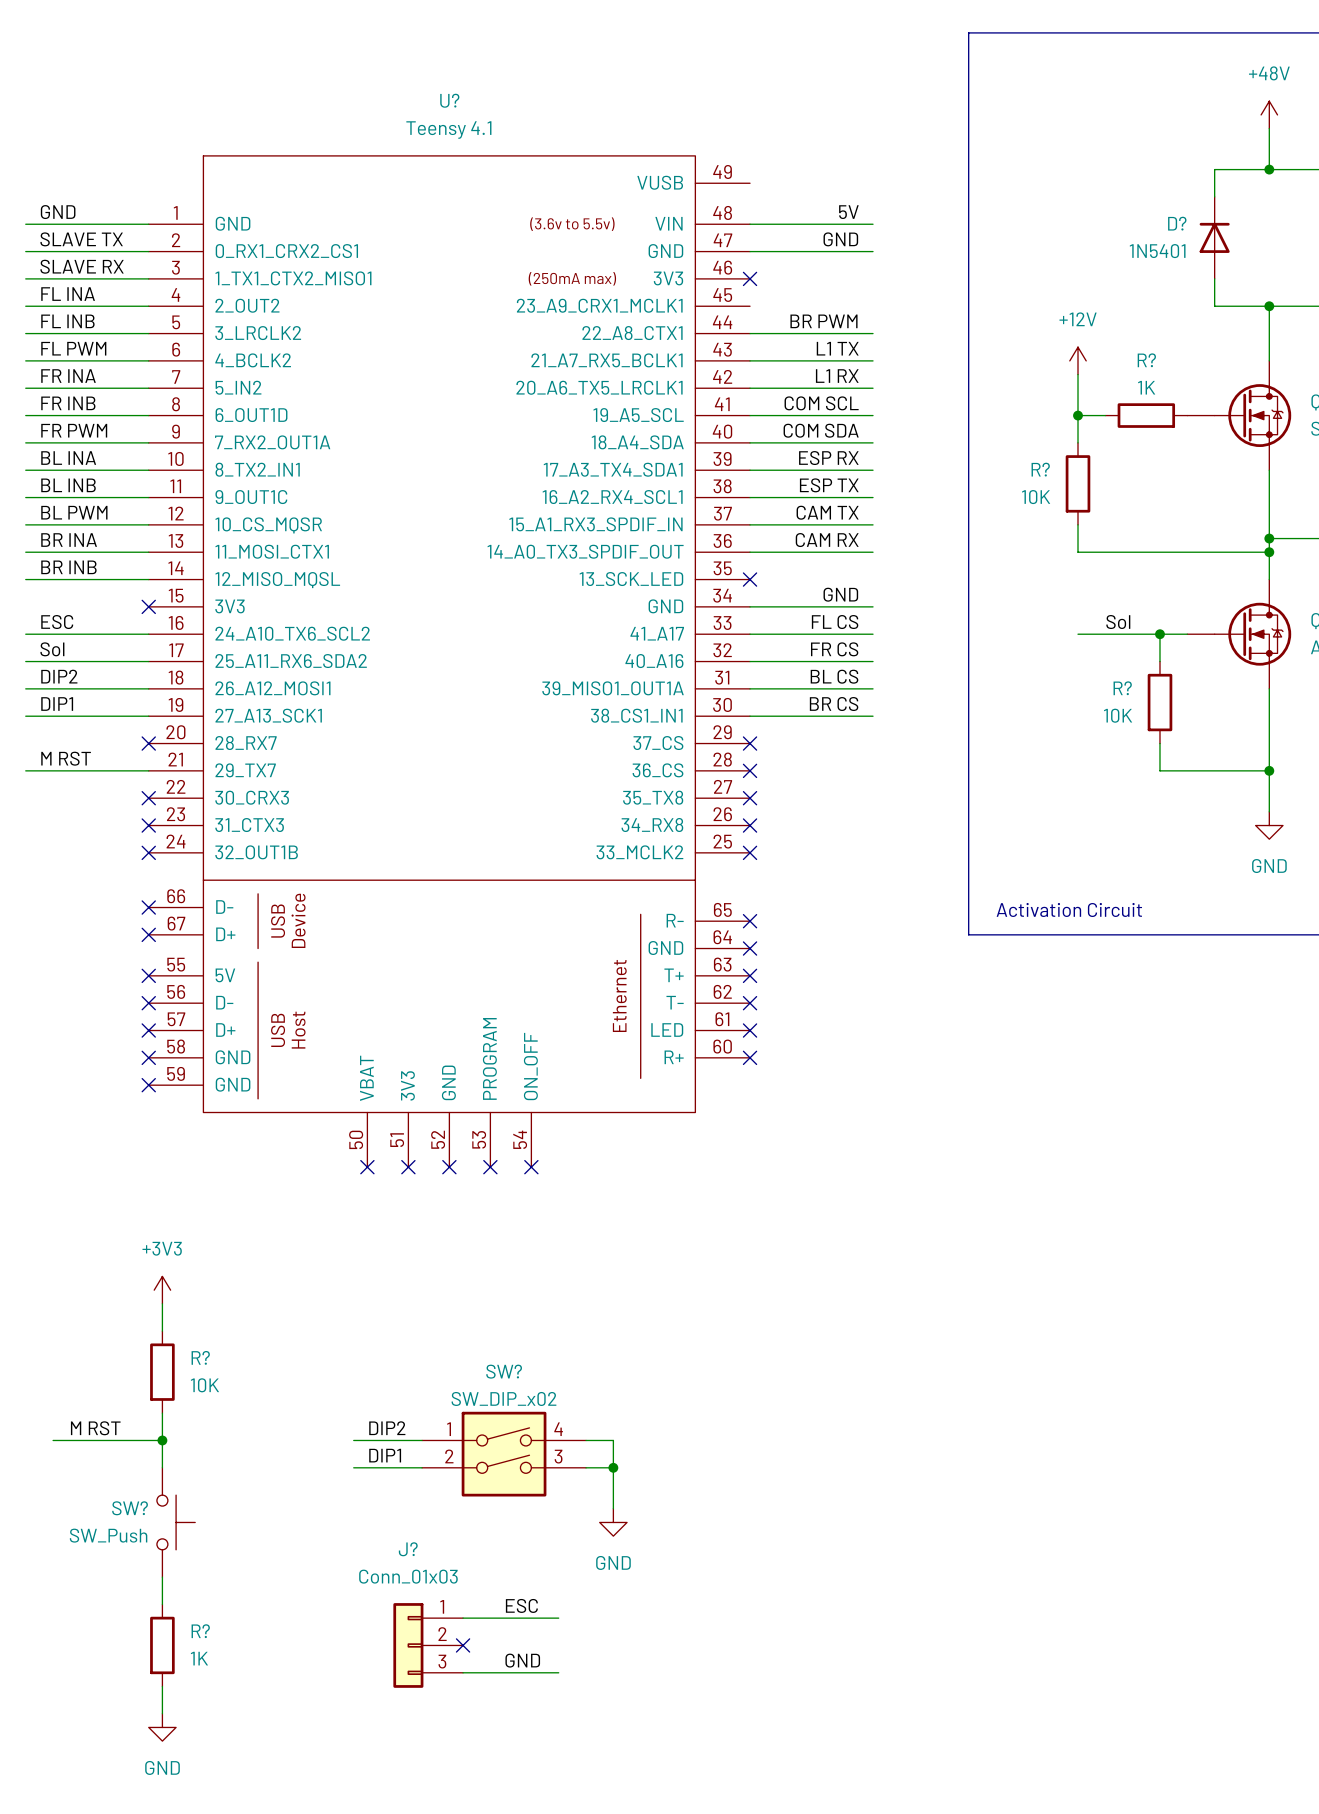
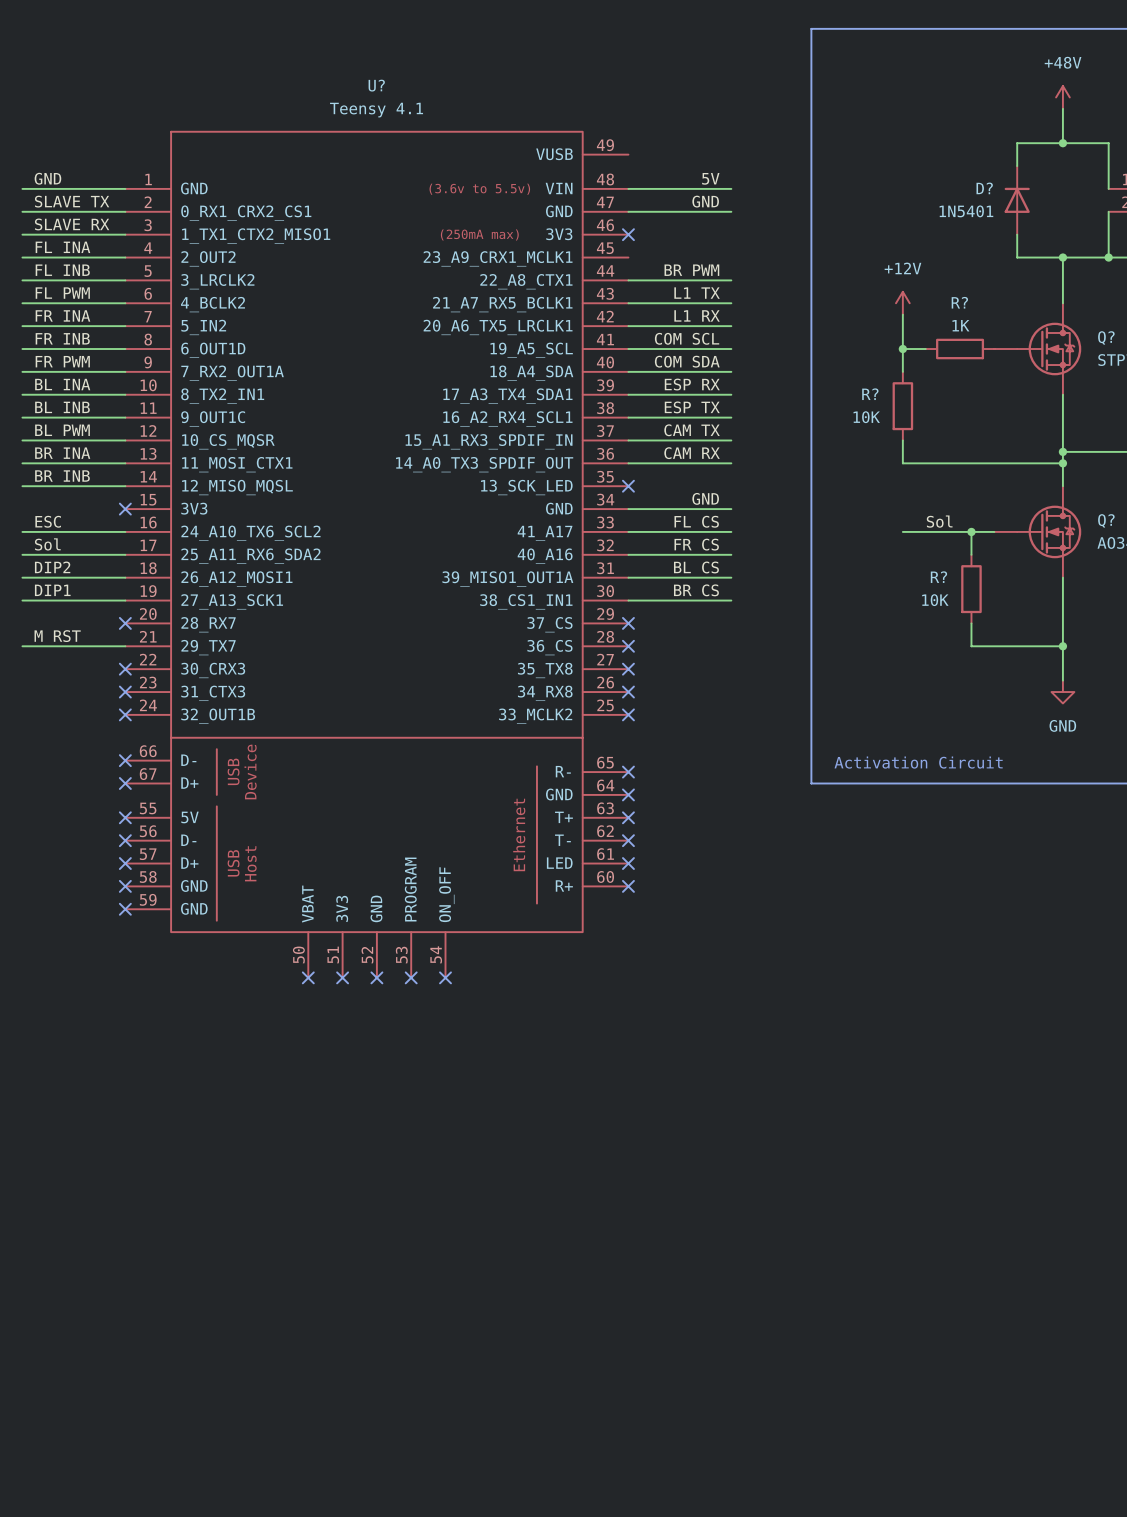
power symbol: +3V3 (162, 1290) -> none
wire: (162, 1303) (162, 1331) -> none
R?: 10K (162, 1372) -> none
wire: (162, 1413) (162, 1467) -> none
label: M RST (95, 1428) -> none
label: DIP2 (387, 1428) -> none
wire: (53, 1440) (162, 1440) -> none
junction: (162, 1440) -> none
wire: (353, 1440) (422, 1440) -> none
wire: (586, 1440) (613, 1440) (613, 1508) -> none
SW?: SW_DIP_x02 (504, 1454) -> none
label: DIP1 (385, 1455) -> none
wire: (353, 1467) (422, 1467) -> none
wire: (586, 1467) (613, 1467) -> none
junction: (613, 1467) -> none
SW?: SW_Push (176, 1522) -> none
power symbol: GND (613, 1522) -> none
wire: (162, 1577) (162, 1604) -> none
label: ESC (521, 1605) -> none
wire: (463, 1618) (558, 1618) -> none
R?: 1K (162, 1645) -> none
J?: Conn_01x03 (428, 1645) -> none
no-connect mark: (463, 1645) -> none
label: GND (522, 1660) -> none
wire: (463, 1672) (558, 1672) -> none
wire: (162, 1686) (162, 1713) -> none
power symbol: GND (162, 1727) -> none

